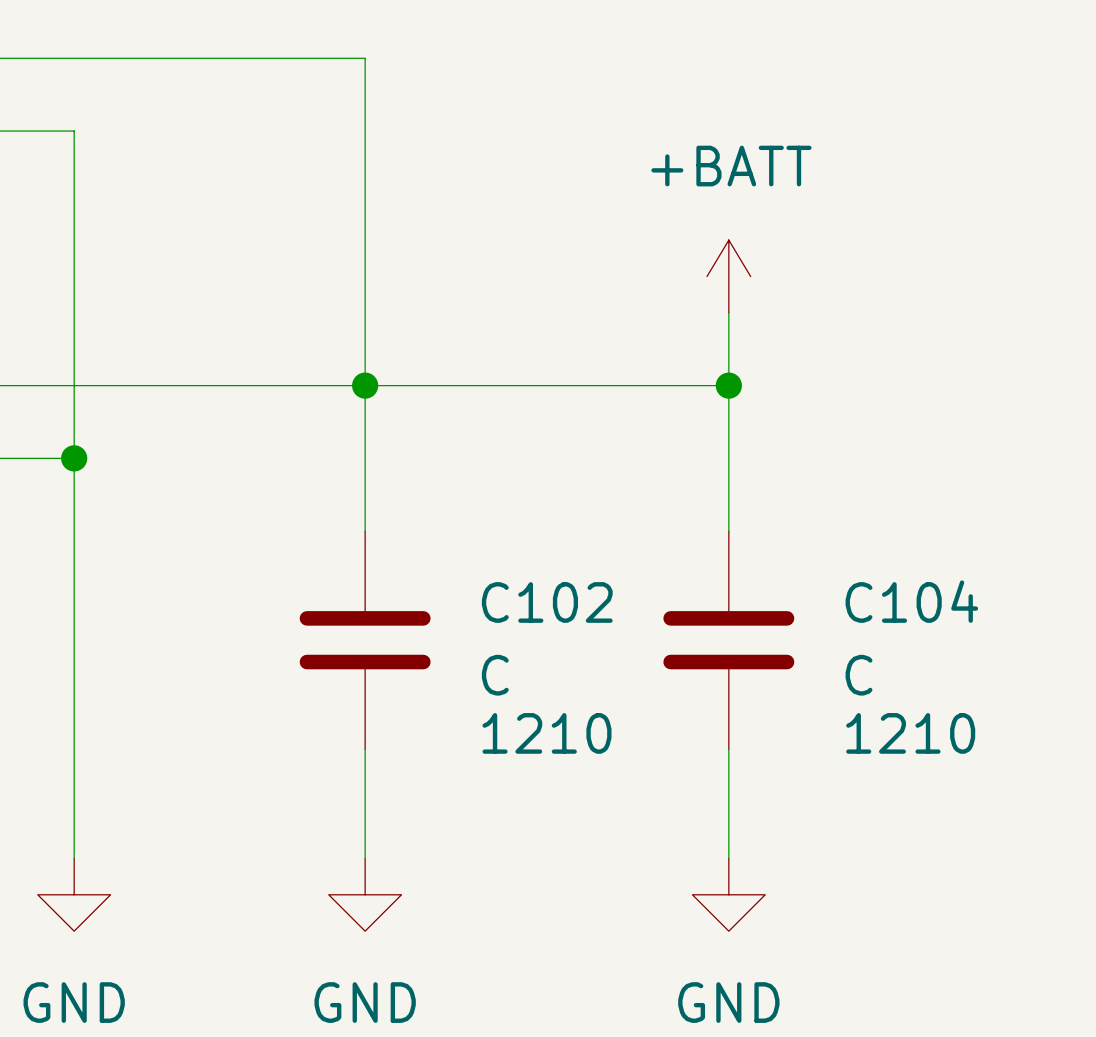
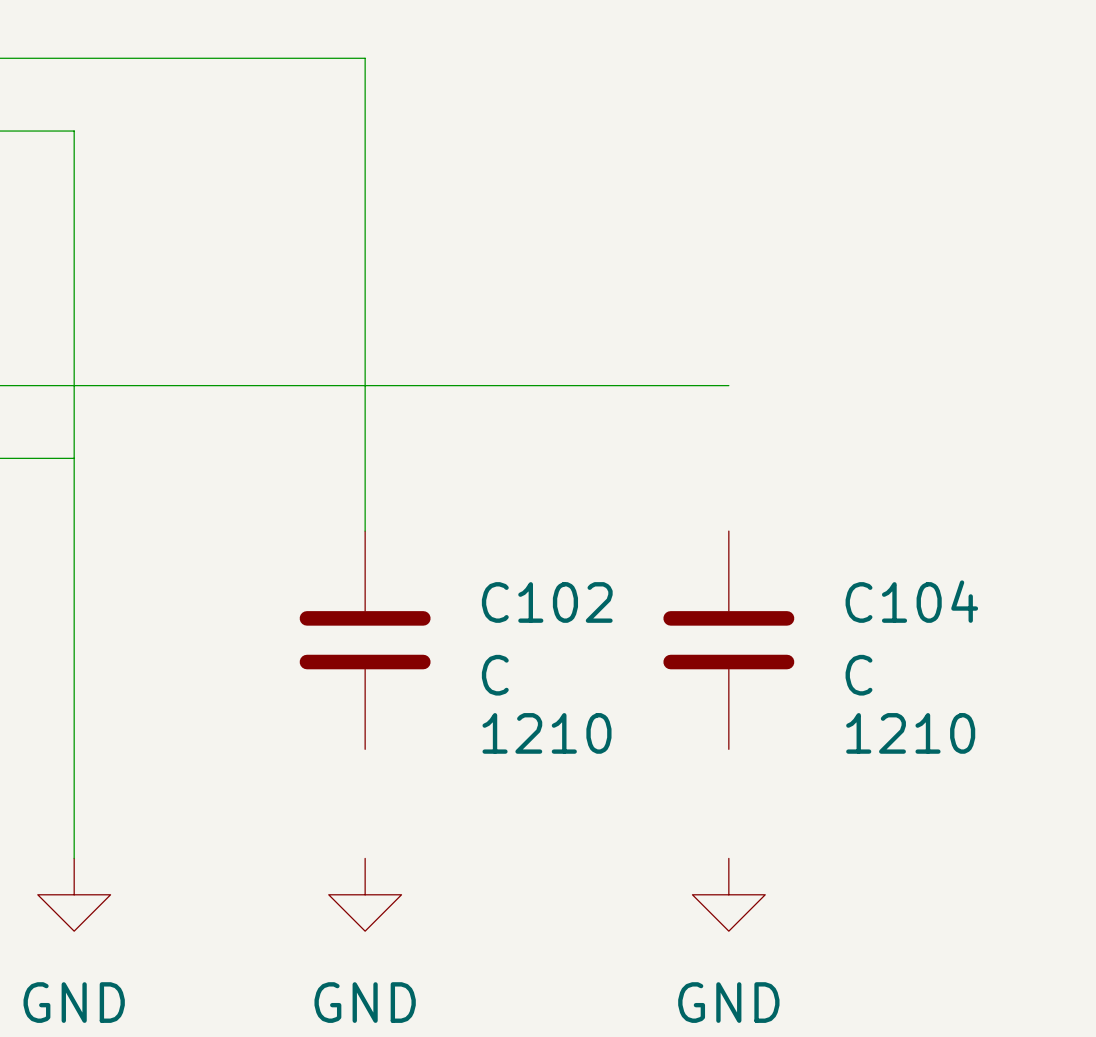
power symbol: +BATT (728, 276) -> none
wire: (728, 312) (728, 531) -> none
junction: (365, 385) -> none
junction: (728, 385) -> none
junction: (74, 458) -> none
wire: (365, 749) (365, 858) -> none
wire: (728, 749) (728, 858) -> none

